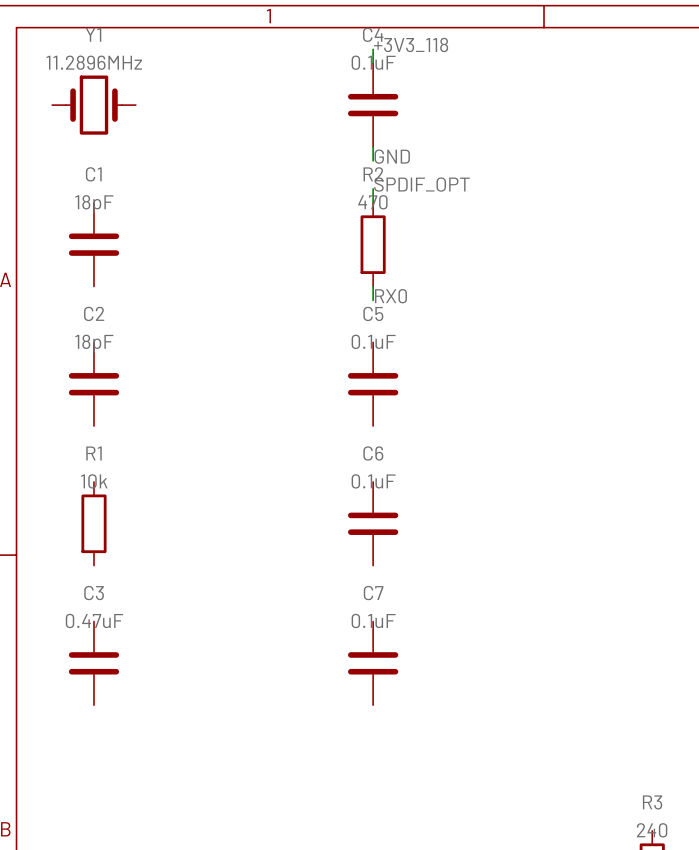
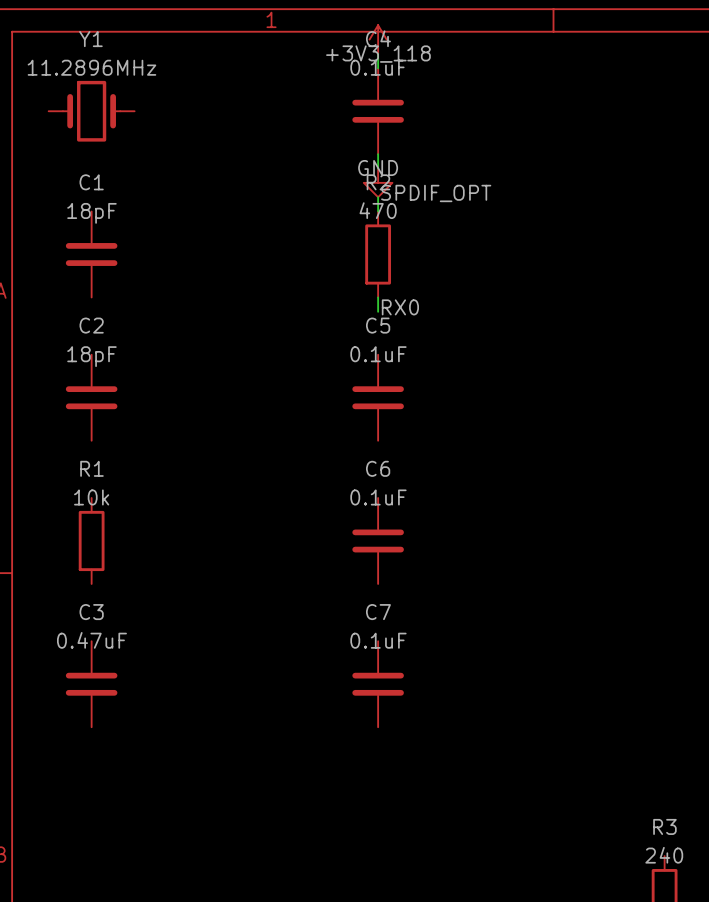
power symbol: none -> +3V3_118 (378, 39)
label: +3V3_118 (411, 44) -> none
label: GND (392, 156) -> none
power symbol: none -> GND (378, 182)

